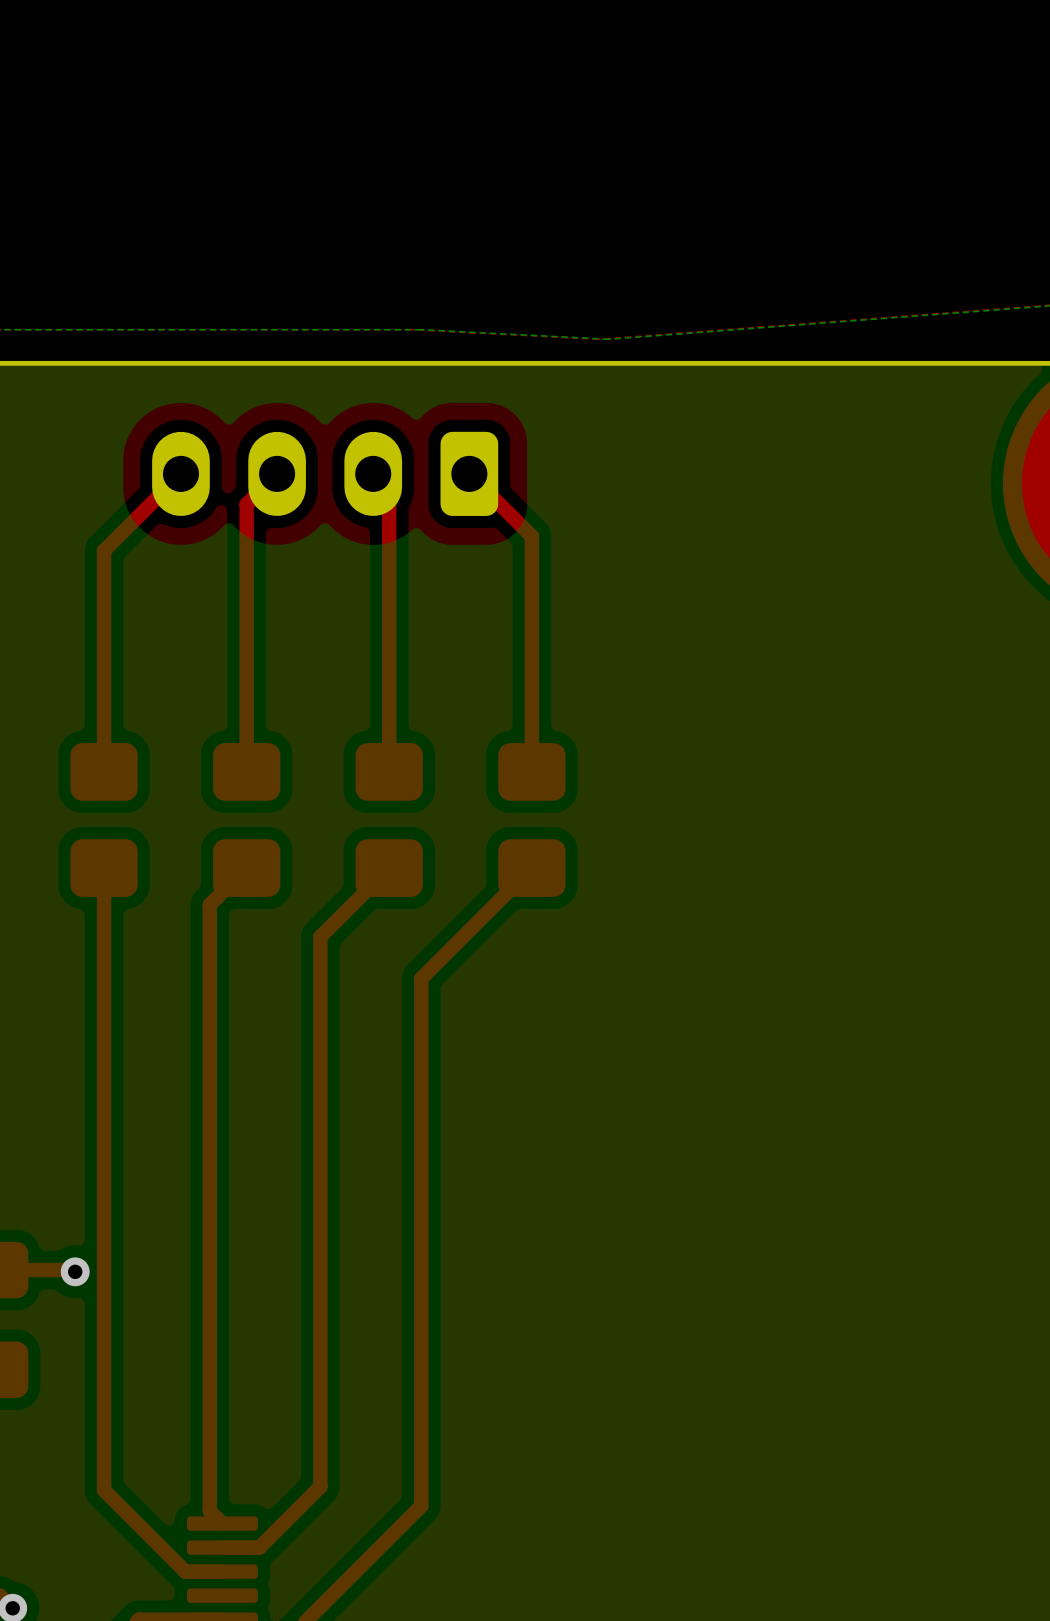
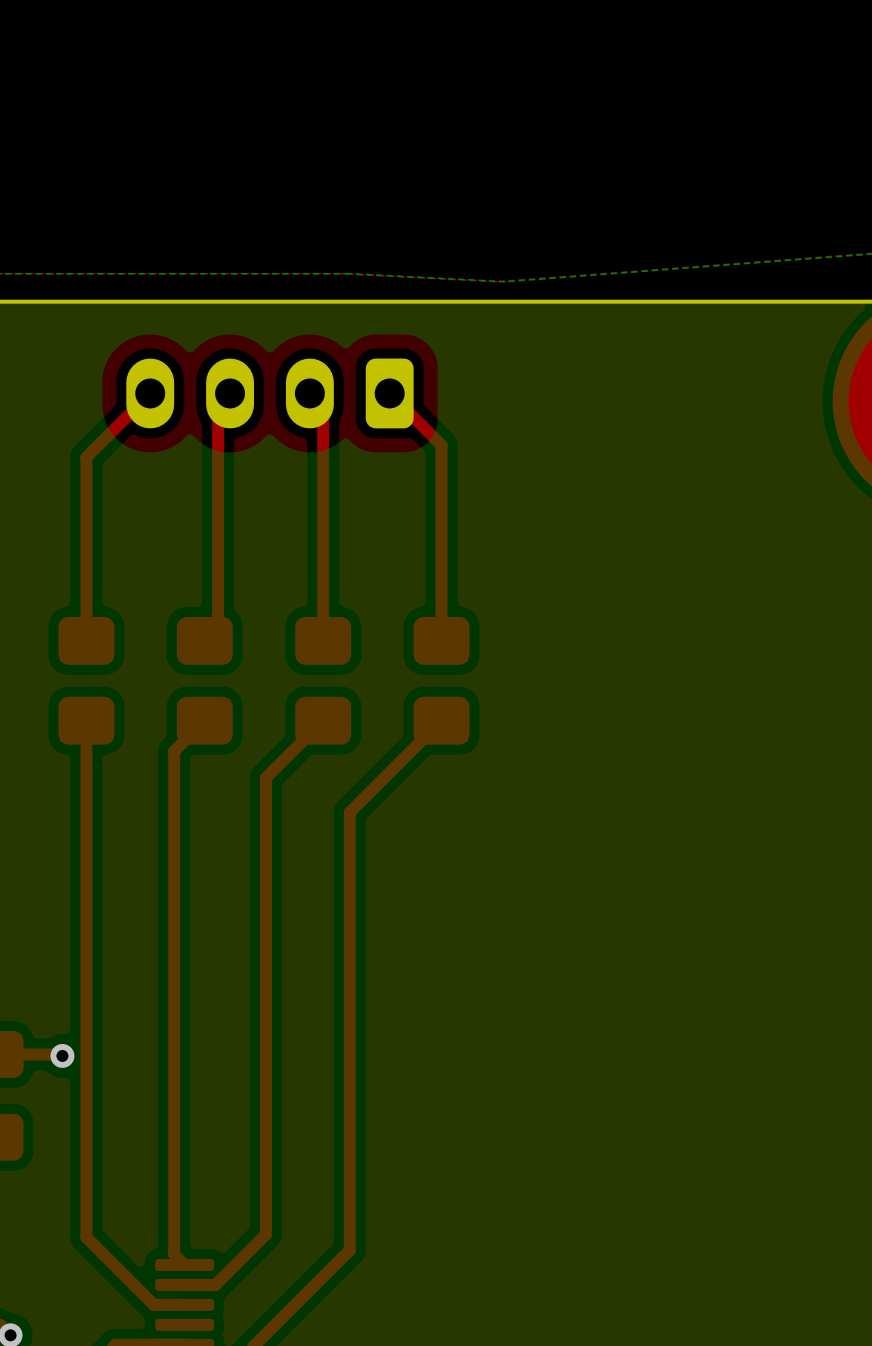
top track: (277, 473) (246, 504) (246, 771) -> none
top track: none -> (218, 405) (218, 627)

